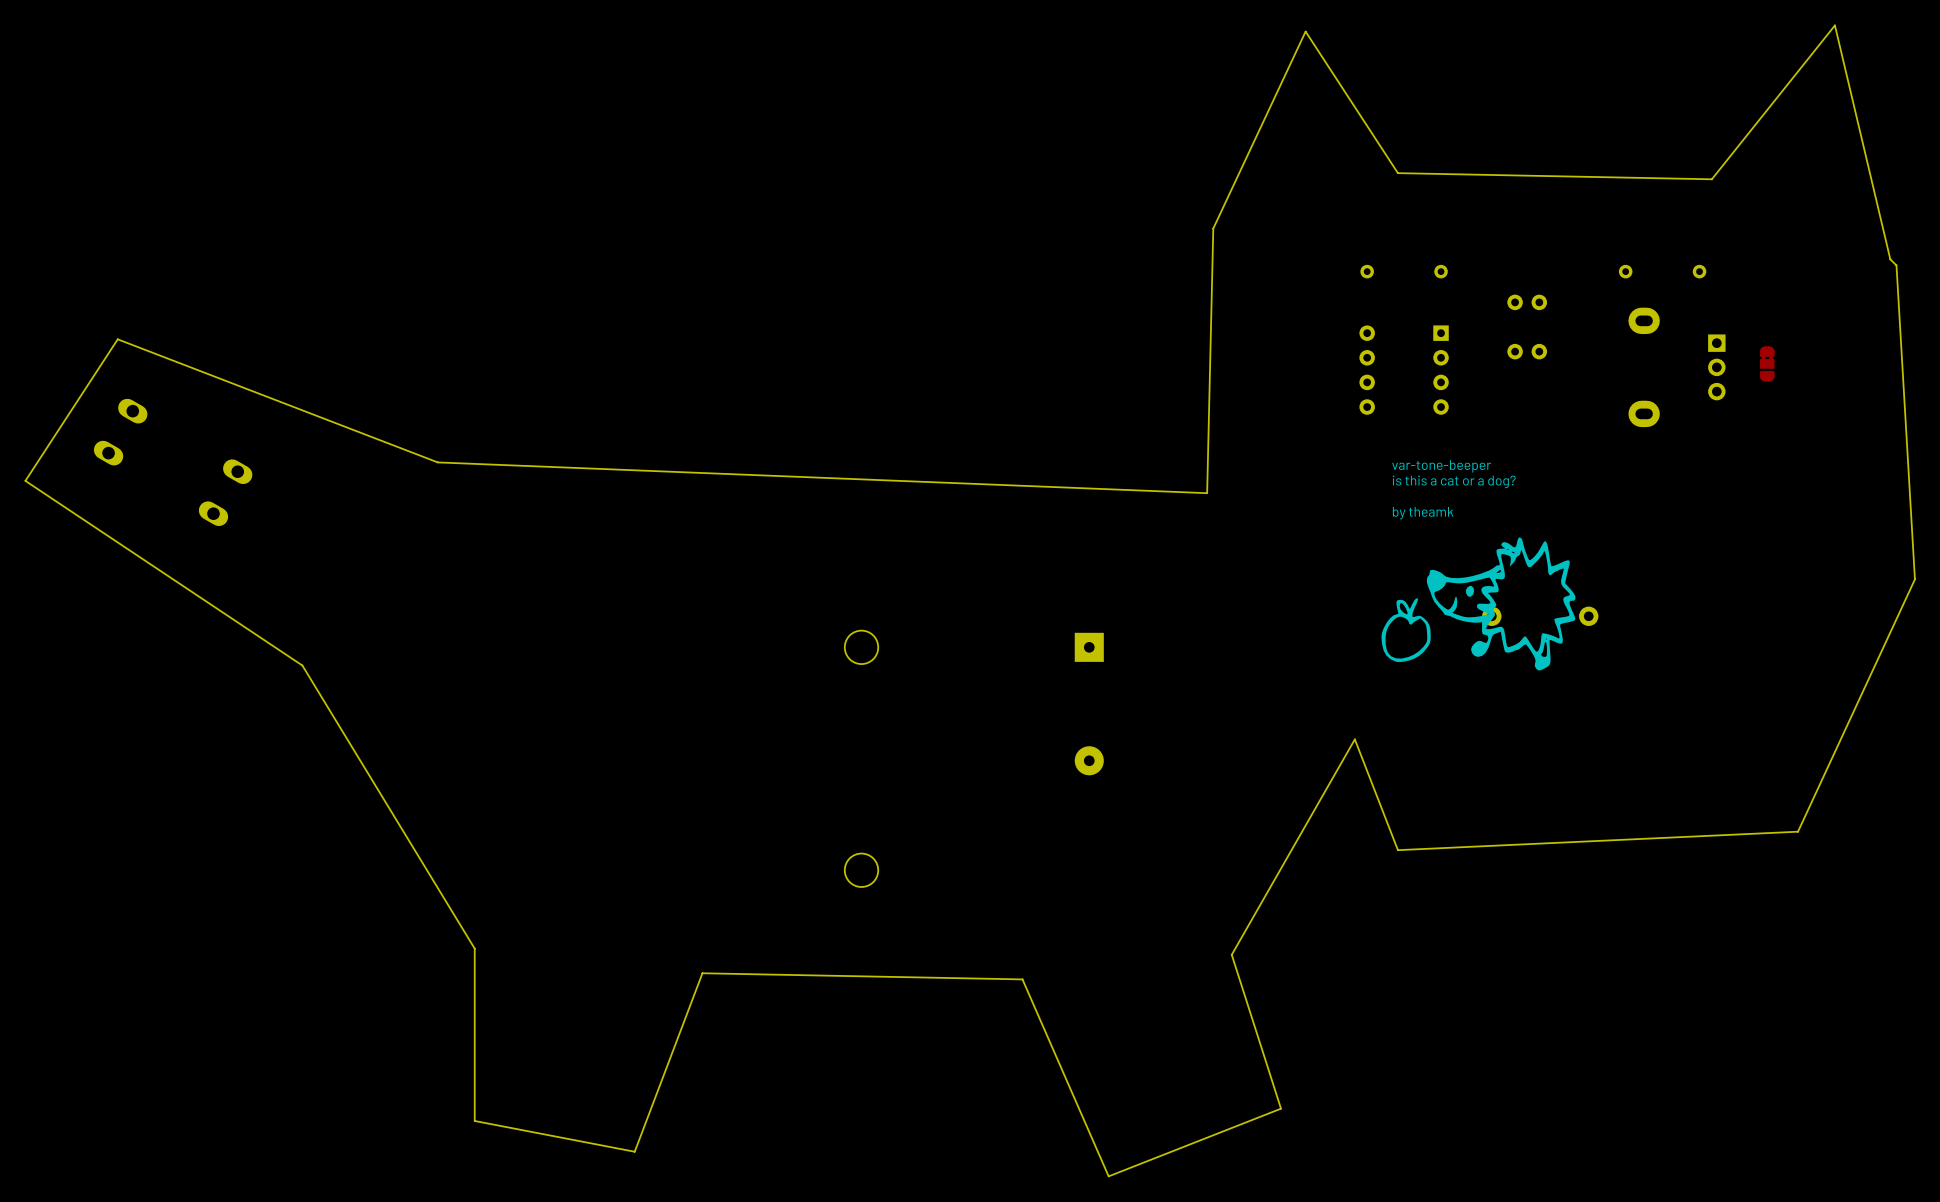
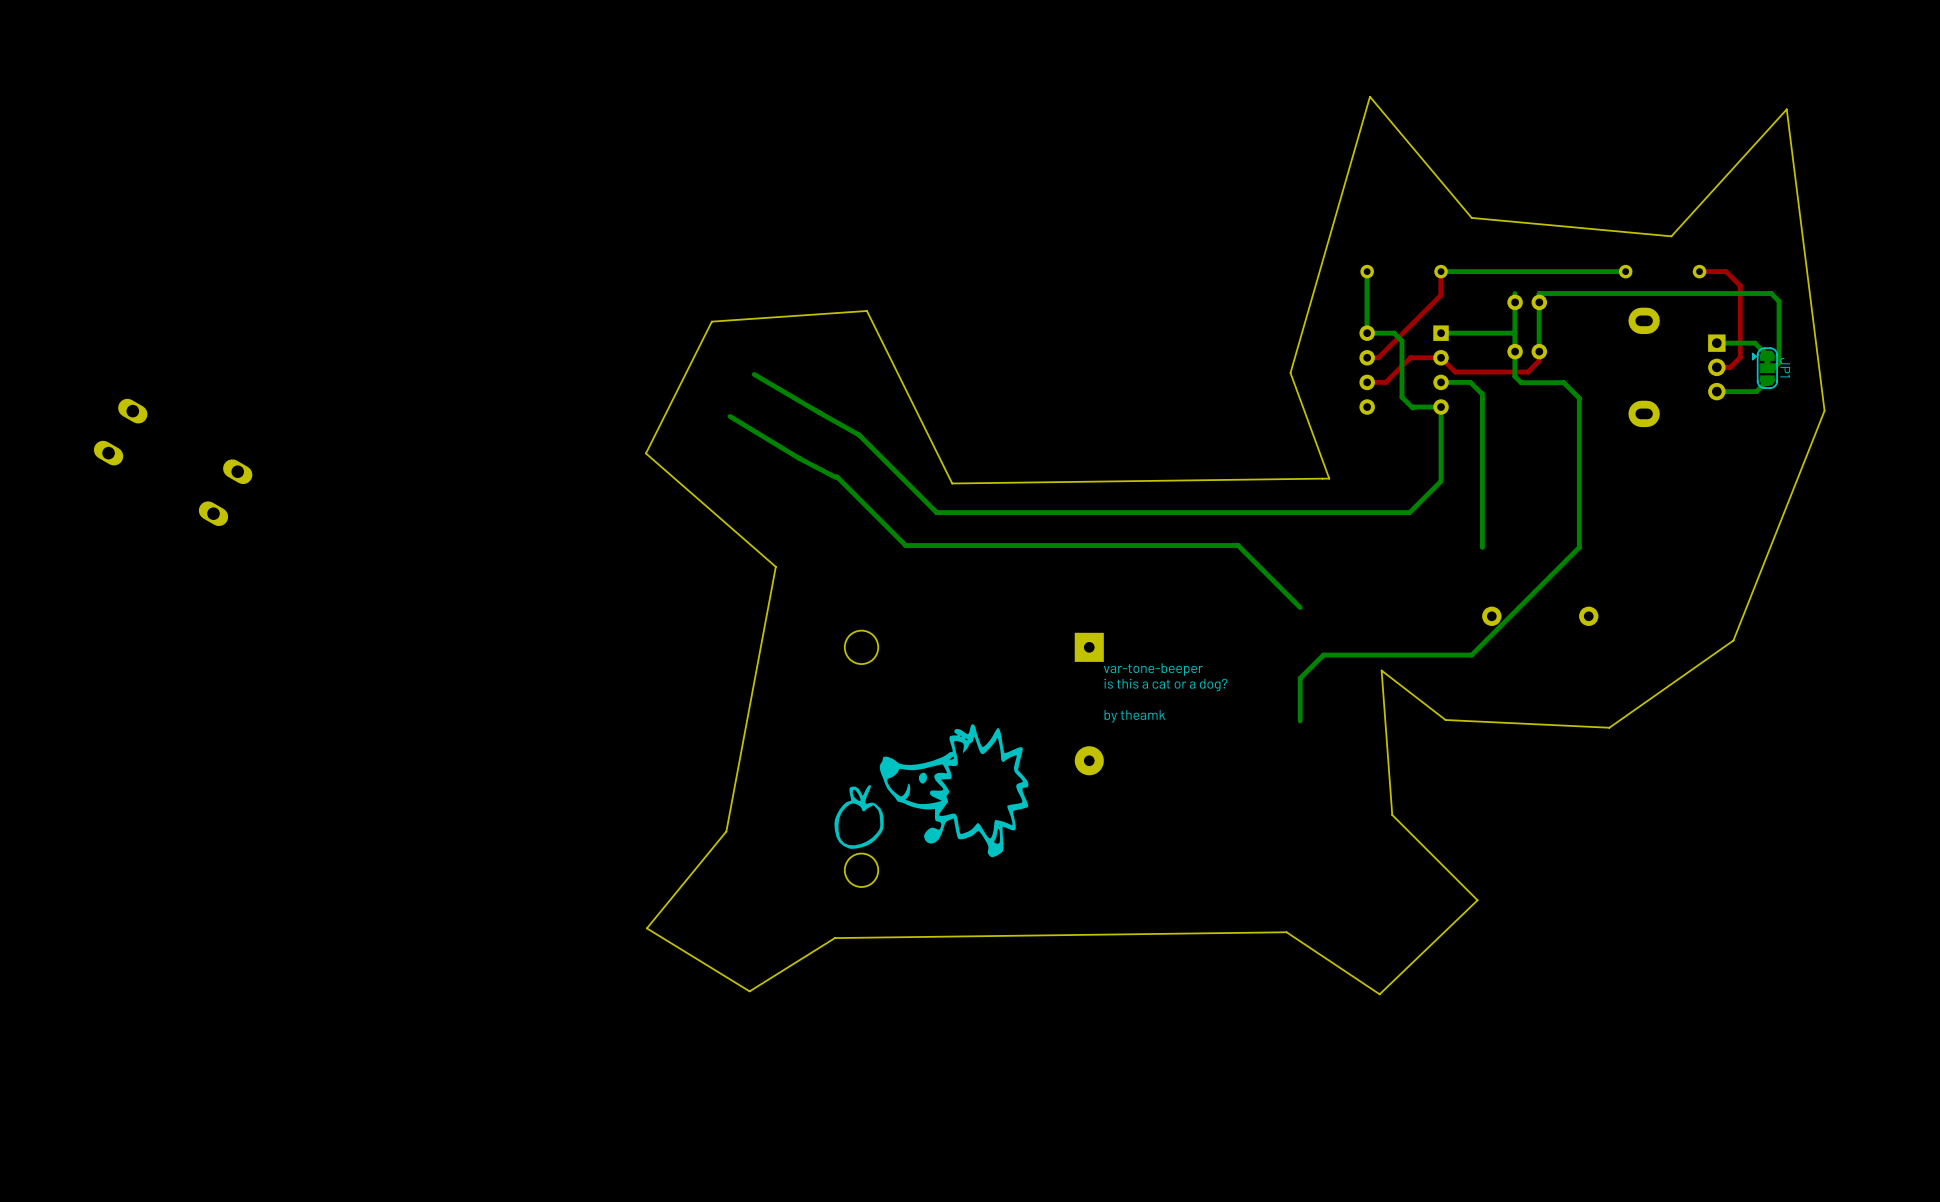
board edge: (1834, 25) (1711, 179) (1397, 173) (1305, 31) (1213, 228) (1207, 493) (437, 462) (117, 339) (25, 480) (302, 665) (474, 948) (474, 1120) (634, 1151) (702, 973) (1022, 979) (1108, 1176) (1281, 1108) (1231, 954) (1354, 739) (1397, 850) (1798, 831) (1914, 579) (1896, 265) (1890, 259) (1834, 25) -> none
board edge: none -> (1369, 96) (1471, 217) (1671, 236) (1786, 109) (1824, 410) (1733, 640) (1609, 727) (1445, 719) (1381, 670) (1392, 814) (1477, 900) (1379, 994) (1286, 932) (834, 938) (749, 991) (646, 928) (726, 831) (775, 566) (645, 453) (711, 321) (866, 310) (952, 483) (1329, 478) (1290, 373) (1369, 96)
bottom track: none -> (1366, 271) (1366, 332) (1394, 333) (1401, 341) (1401, 397) (1412, 407) (1441, 407) (1441, 481) (1409, 512) (936, 512) (859, 435) (754, 374)
top track: none -> (1440, 271) (1440, 295) (1378, 357) (1367, 357)
bottom track: none -> (1625, 271) (1440, 271)
top track: none -> (1699, 271) (1726, 271) (1740, 285) (1740, 357) (1730, 367) (1716, 367)
bottom track: none -> (1514, 293) (1514, 376) (1521, 382) (1563, 382) (1579, 398) (1579, 547) (1471, 655) (1323, 655) (1300, 678) (1300, 720)
bottom track: none -> (1514, 333) (1441, 333)
bottom track: none -> (1716, 343) (1754, 343) (1767, 355)
bottom track: none -> (1539, 345) (1539, 293) (1771, 293) (1779, 301) (1779, 362) (1773, 368) (1767, 368)
top track: none -> (1539, 345) (1539, 360) (1527, 372) (1455, 372) (1441, 357) (1410, 357) (1385, 382) (1367, 382)
JP1 side: top (1767, 363) -> bottom (1764, 368)
bottom track: none -> (1767, 380) (1756, 391) (1716, 391)
bottom track: none -> (1441, 382) (1470, 382) (1481, 393)
bottom track: none -> (1482, 393) (1482, 399)
bottom track: none -> (1482, 400) (1482, 547)
bottom track: none -> (730, 416) (799, 458) (837, 477) (905, 545) (1238, 545) (1300, 607)
text: var-tone-beeper (1441, 466) -> none
text: is this a cat or a dog? (1454, 481) -> none
text: by theamk (1423, 513) -> none
drawing: [1381, 537, 1576, 671] -> none
text: none -> var-tone-beeper (1153, 669)
text: none -> is this a cat or a dog? (1165, 685)
text: none -> by theamk (1134, 716)
drawing: none -> [834, 724, 1029, 858]

